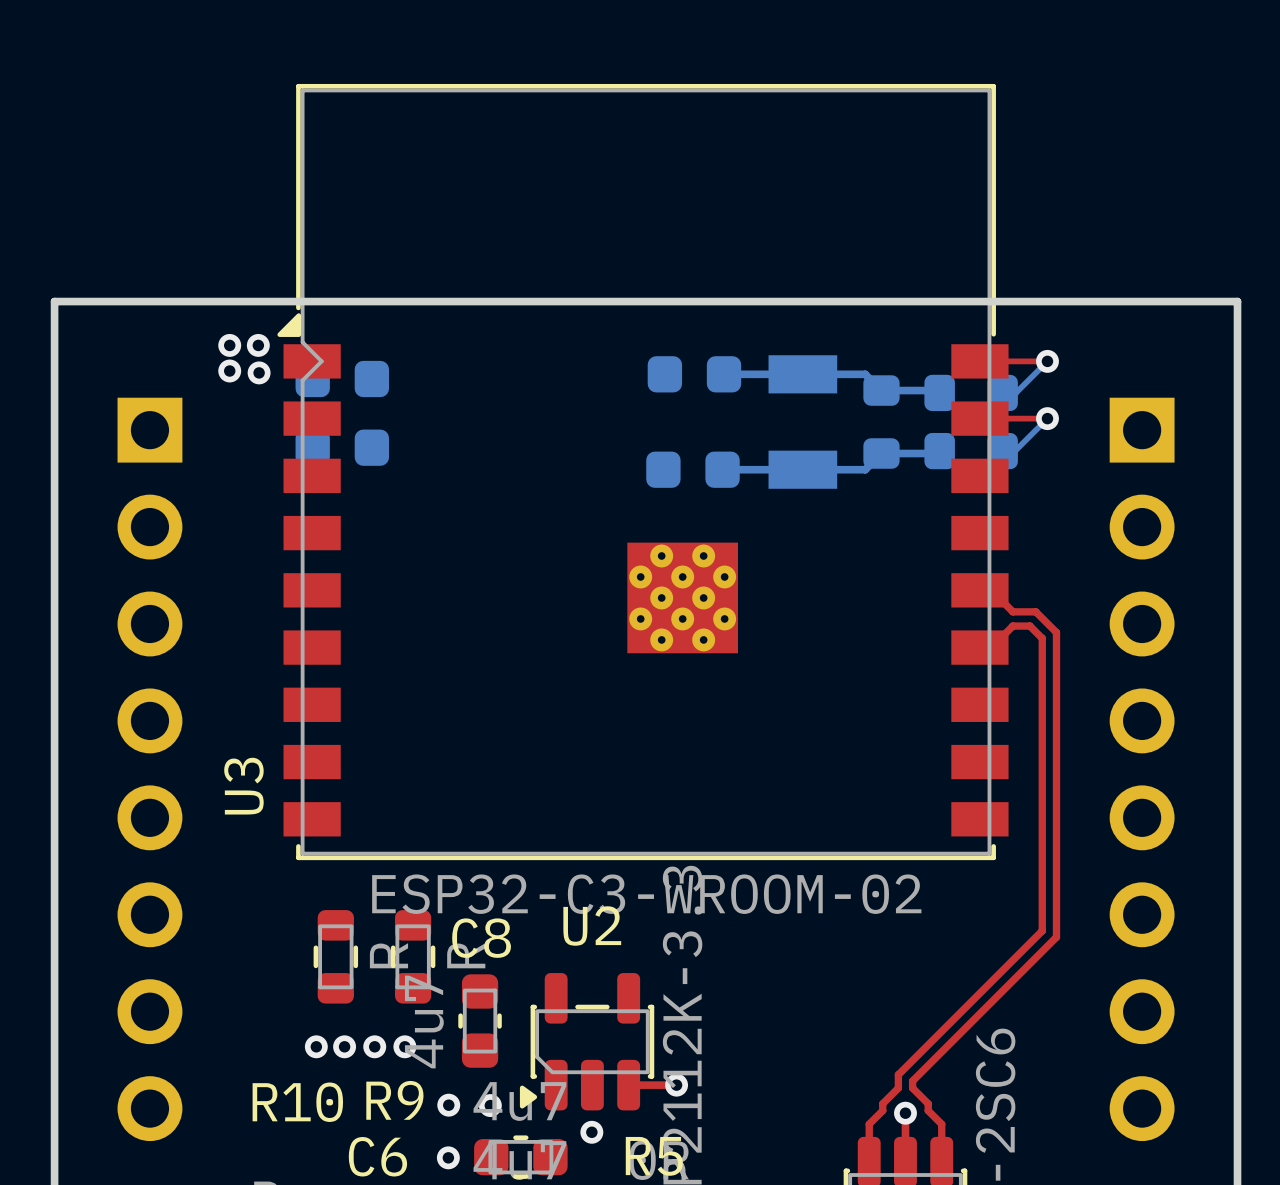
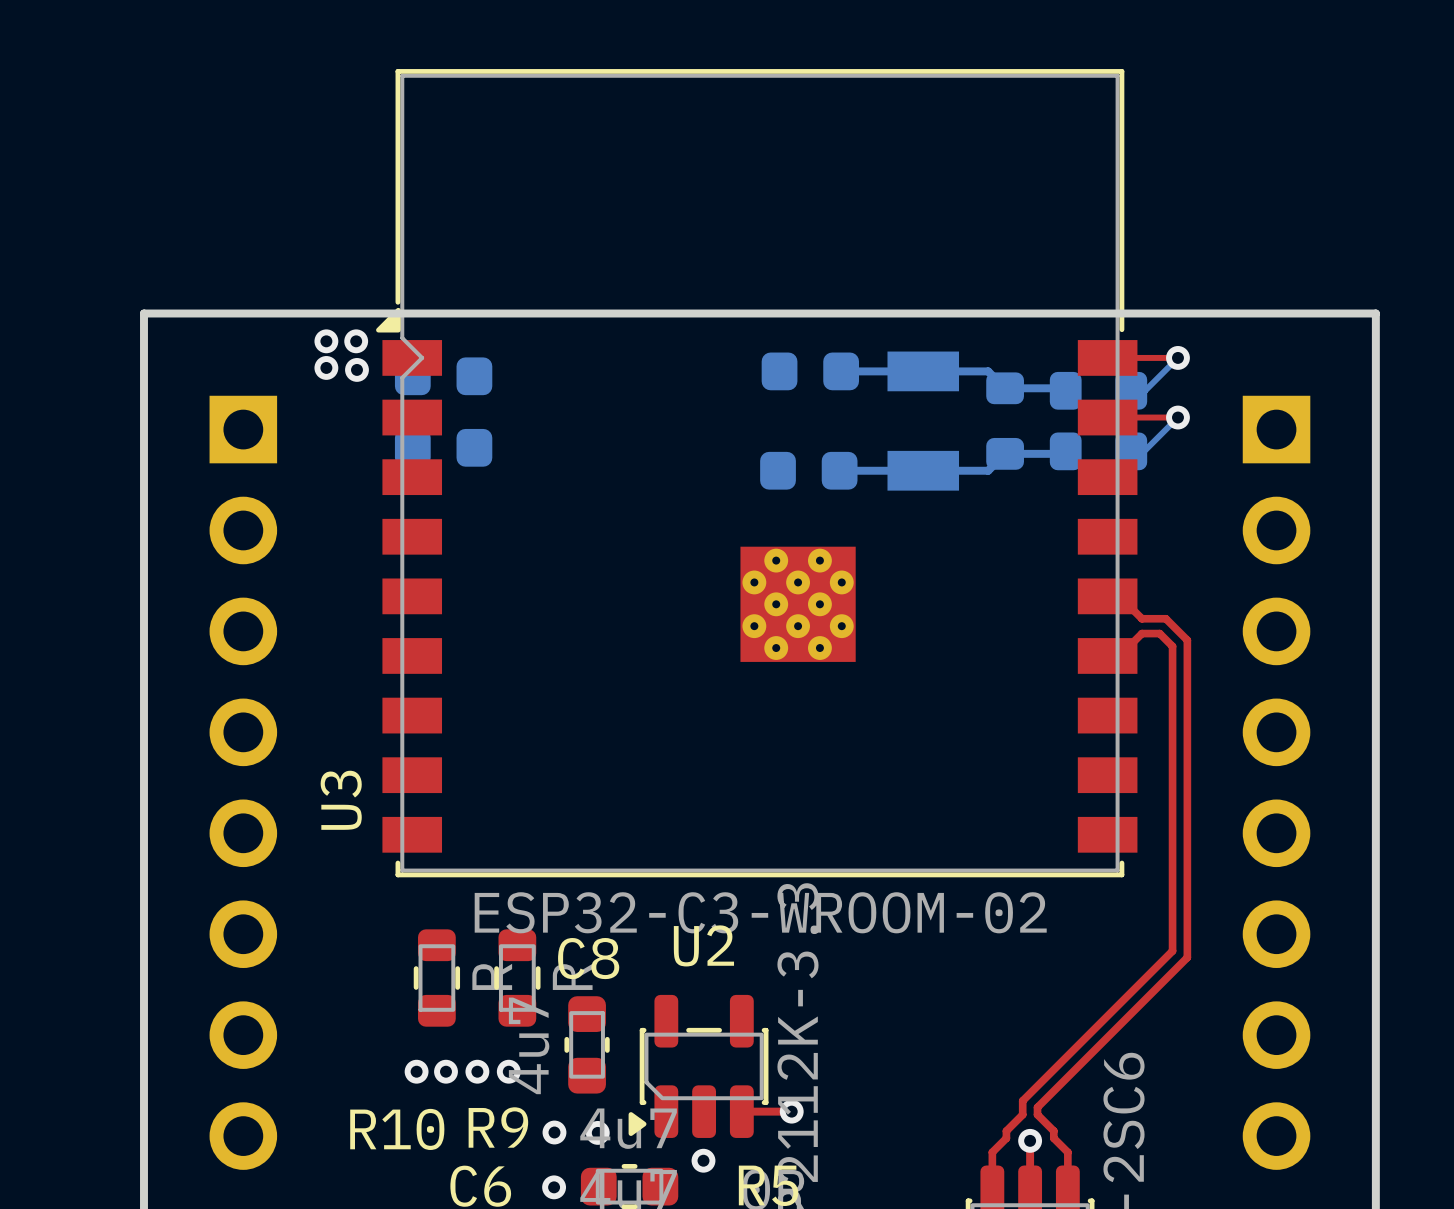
board edge: (54, 318) (54, 301) (1237, 301) (1237, 318) -> (143, 313) (1375, 313)

